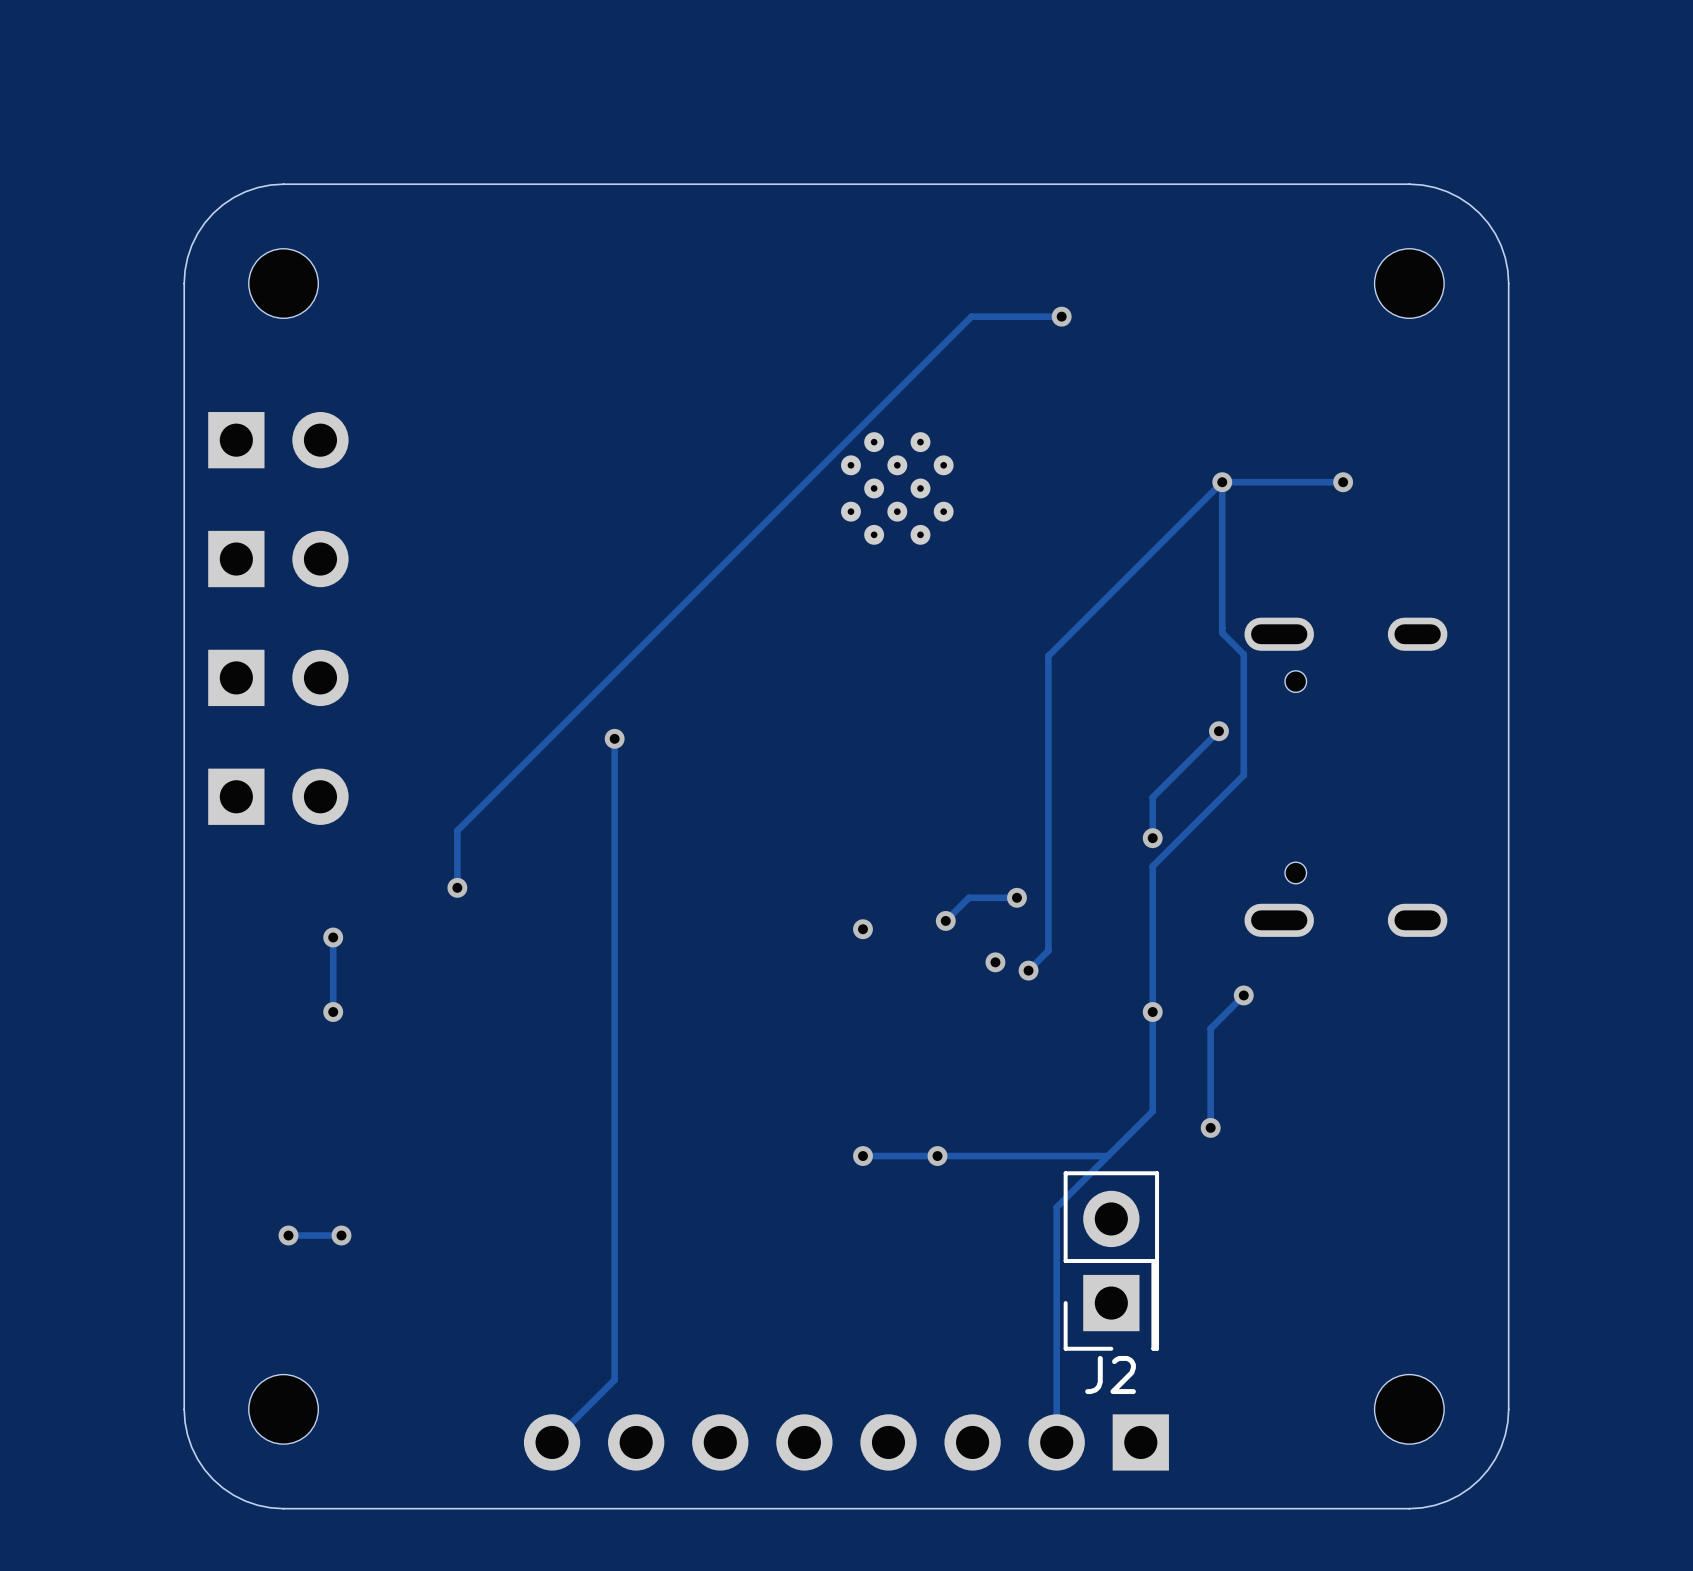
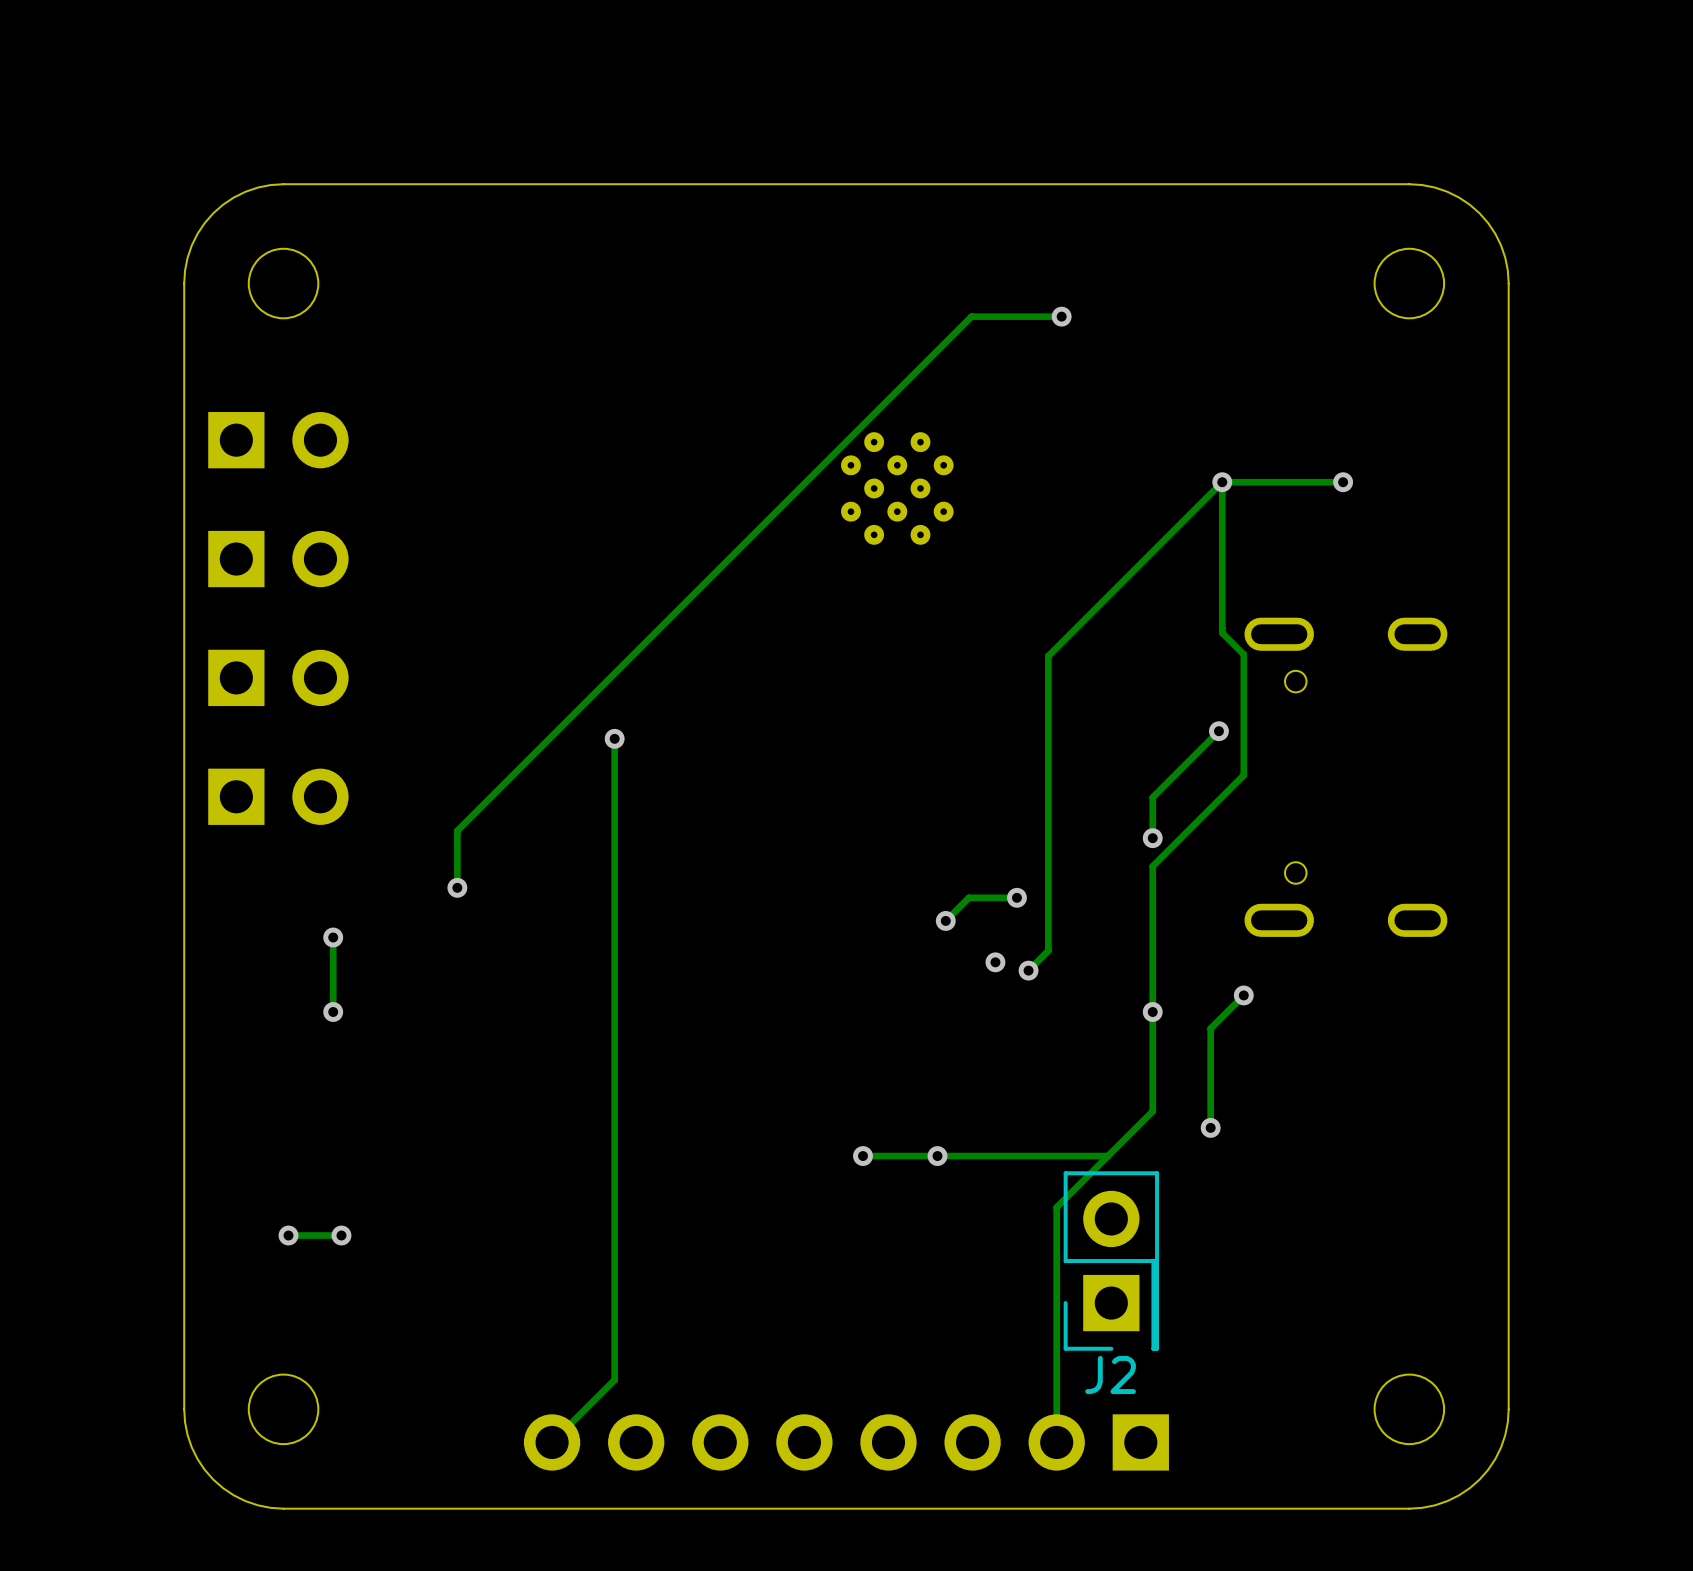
via: (863, 929) -> none

